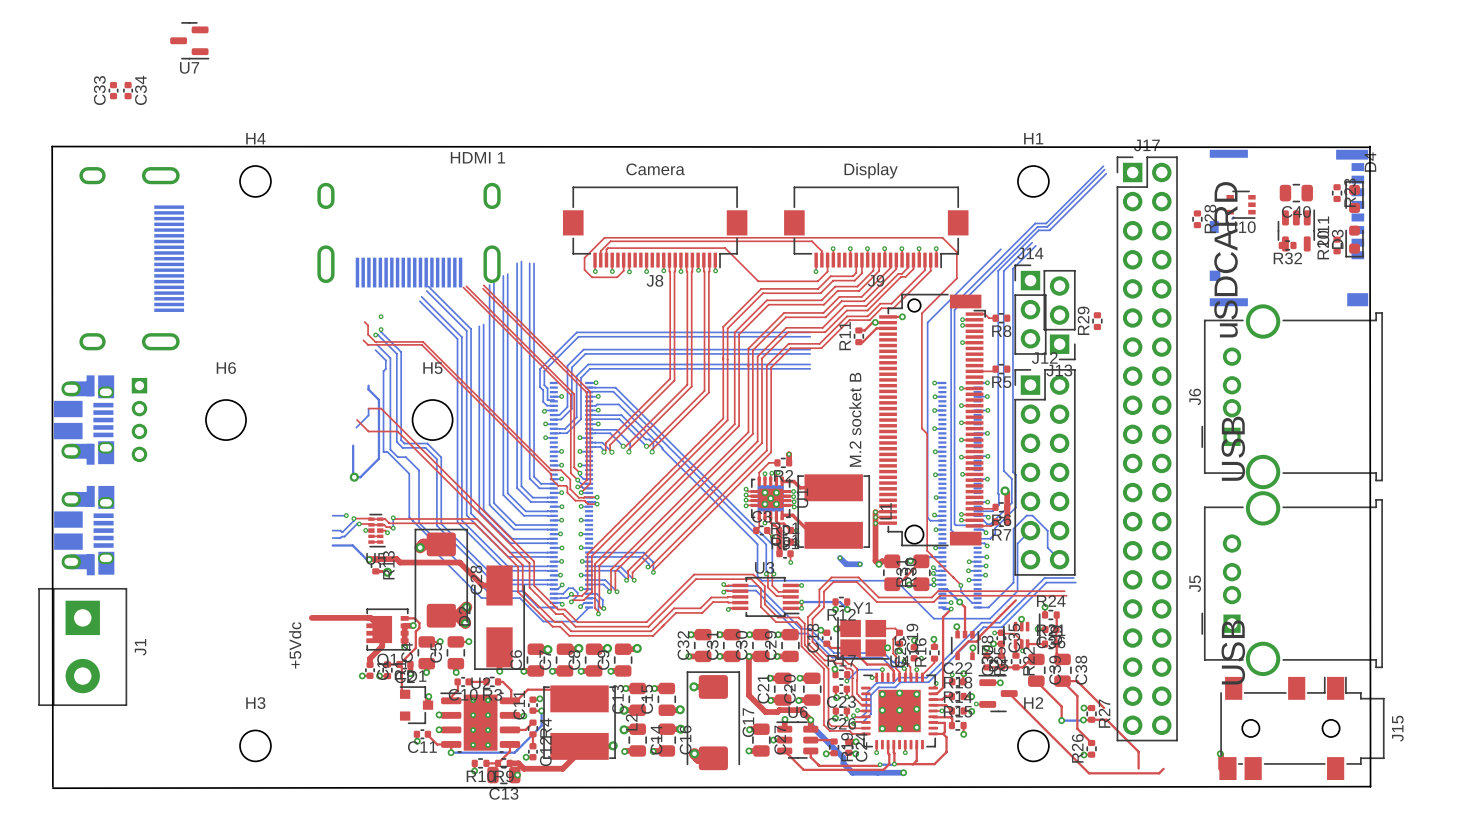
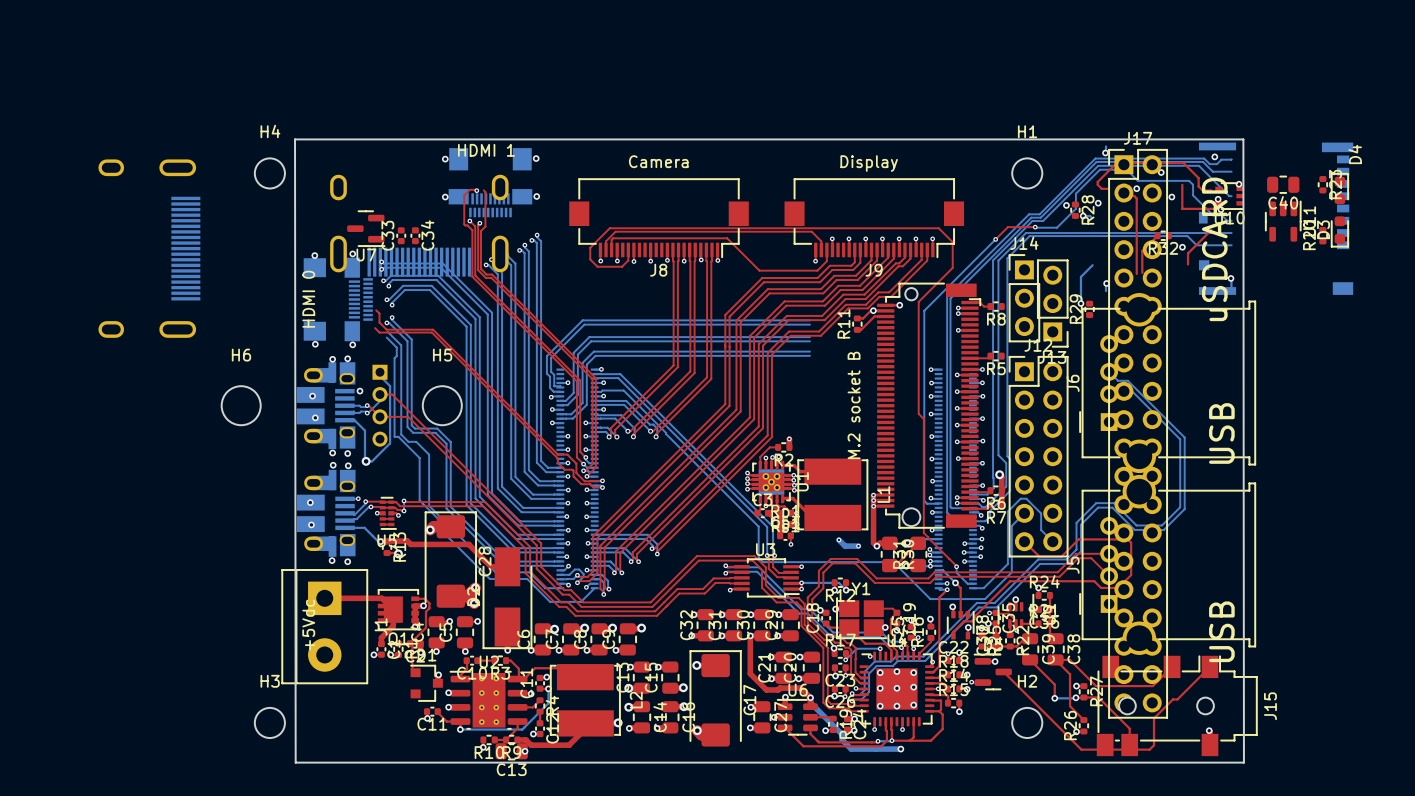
U7 position: (189, 40) -> (366, 228)
C33 position: (113, 90) -> (401, 235)
C34 position: (128, 90) -> (415, 235)
board edge: none -> (295, 139) (1243, 139) (1243, 762) (295, 762) (295, 139)
board edge: (1369, 146) (1370, 786) (52, 788) -> none
board edge: (1369, 147) (52, 146) (52, 786) -> none
bottom track: none -> (1105, 146) (1105, 152)
via: none -> (1105, 152)
via: none -> (1214, 156)
via: none -> (445, 159)
via: none -> (536, 158)
bottom track: none -> (1095, 158) (1204, 158) (1209, 164) (1217, 164) (1221, 159) (1231, 159)
bottom track: none -> (1096, 161) (1203, 161) (1212, 171) (1231, 171)
bottom track: none -> (1098, 165) (1198, 165) (1229, 196) (1231, 196)
via: none -> (1161, 172)
part: none -> (490, 182)
via: none -> (1238, 184)
top track: none -> (1182, 184) (1182, 208) (1220, 209)
top track: none -> (1107, 188) (1101, 188) (1097, 181) (1116, 163) (1183, 163) (1198, 178) (1198, 186) (1202, 190) (1211, 190)
via: none -> (1136, 188)
top track: none -> (483, 190) (485, 192) (485, 226) (480, 231) (480, 268) (486, 274) (492, 274)
top track: none -> (476, 190) (469, 189) (464, 195) (464, 224) (472, 230) (472, 276)
via: none -> (476, 190)
top track: none -> (1128, 196) (1134, 196) (1136, 198) (1136, 273)
via: none -> (445, 197)
via: none -> (536, 196)
via: none -> (1171, 197)
via: none -> (1218, 199)
via: none -> (1098, 203)
via: none -> (1066, 205)
via: none -> (1220, 209)
R28 position: (1197, 219) -> (1075, 210)
bottom track: none -> (1083, 216) (1091, 217)
via: none -> (1083, 216)
top track: none -> (469, 221) (475, 226) (475, 275)
via: none -> (469, 221)
bottom track: none -> (1231, 220) (1227, 220) (1222, 215) (1213, 215) (1193, 195) (1193, 184) (1189, 180) (1137, 180) (1126, 169) (1099, 169) (1075, 193) (1075, 208) (1056, 227) (1035, 227)
top track: none -> (479, 223) (478, 224) (478, 270) (485, 277) (491, 277)
via: none -> (479, 223)
top track: none -> (1035, 227) (1007, 227) (995, 239)
via: none -> (1035, 227)
top track: none -> (1211, 230) (1188, 253) (1188, 264)
bottom track: none -> (1026, 233) (1231, 233)
bottom track: none -> (537, 235) (541, 241) (541, 253)
via: none -> (537, 235)
bottom track: none -> (1029, 236) (1187, 236) (1196, 245) (1231, 245)
top track: none -> (1157, 235) (1142, 251) (1142, 272)
R32 position: (1287, 245) -> (1163, 235)
via: none -> (995, 239)
bottom track: none -> (531, 240) (536, 243) (536, 253)
via: none -> (531, 240)
bottom track: none -> (524, 245) (528, 251)
via: none -> (524, 245)
via: none -> (1182, 247)
bottom track: none -> (519, 250) (524, 253)
via: none -> (519, 250)
via: none -> (352, 253)
bottom track: none -> (508, 254) (515, 263)
via: none -> (314, 255)
bottom track: none -> (502, 259) (511, 265)
via: none -> (491, 259)
bottom track: none -> (381, 261) (383, 263) (442, 263) (492, 312)
via: none -> (381, 261)
bottom track: none -> (486, 264) (497, 274)
via: none -> (486, 264)
bottom track: none -> (1092, 265) (1080, 276) (1080, 303)
bottom track: none -> (381, 269) (383, 267) (441, 267) (487, 314)
via: none -> (381, 269)
bottom track: none -> (438, 275) (390, 275) (383, 280)
bottom track: none -> (1230, 278) (1231, 288)
via: none -> (1230, 278)
bottom track: none -> (436, 280) (392, 280) (388, 286)
via: none -> (383, 280)
bottom track: none -> (1106, 283) (1105, 291)
via: none -> (1106, 283)
bottom track: none -> (431, 285) (403, 285) (386, 299)
via: none -> (388, 286)
bottom track: none -> (429, 290) (404, 290) (392, 305)
text: none -> HDMI 0 (308, 299)
part: none -> (338, 299)
via: none -> (386, 299)
via: none -> (1080, 303)
via: none -> (315, 344)
via: none -> (352, 344)
via: none -> (347, 358)
via: none -> (332, 359)
bottom track: none -> (1109, 371) (1118, 380) (1127, 380) (1184, 437) (1184, 509) (1163, 529) (1134, 529) (1112, 507) (1098, 507) (1080, 524) (1080, 551) (1068, 563)
J6 position: (1292, 396) -> (1167, 383)
via: none -> (359, 391)
bottom track: none -> (1109, 394) (1118, 385) (1126, 385) (1180, 439) (1180, 507) (1162, 525) (1136, 525) (1114, 503) (1096, 503) (1076, 522) (1076, 549) (1066, 559)
via: none -> (312, 396)
bottom track: none -> (367, 405) (344, 405)
via: none -> (367, 405)
part: (84, 420) -> none
part position: (139, 420) -> (379, 405)
part: none -> (326, 405)
bottom track: none -> (344, 412) (368, 413)
via: none -> (367, 413)
via: none -> (315, 417)
bottom track: none -> (344, 420) (354, 420) (364, 430)
via: none -> (332, 452)
via: none -> (347, 453)
via: none -> (333, 465)
via: none -> (348, 465)
via: none -> (310, 502)
part: (84, 530) -> none
part: none -> (326, 513)
via: none -> (311, 524)
top track: none -> (1024, 541) (1039, 556) (1061, 556) (1078, 539) (1127, 539) (1131, 542) (1131, 575) (1118, 587) (1101, 587) (1094, 581) (1010, 581)
top track: none -> (1109, 553) (1076, 553) (1057, 572)
via: none -> (332, 560)
via: none -> (347, 561)
J5 position: (1292, 583) -> (1167, 564)
top track: none -> (1109, 576) (1091, 558) (1078, 558) (1059, 576)
J1 position: (82, 646) -> (324, 626)
top track: none -> (1172, 666) (1152, 686) (1096, 686)
top track: none -> (1209, 666) (1177, 699) (1172, 699) (1154, 718) (1154, 745)
J15 position: (1301, 728) -> (1177, 705)

